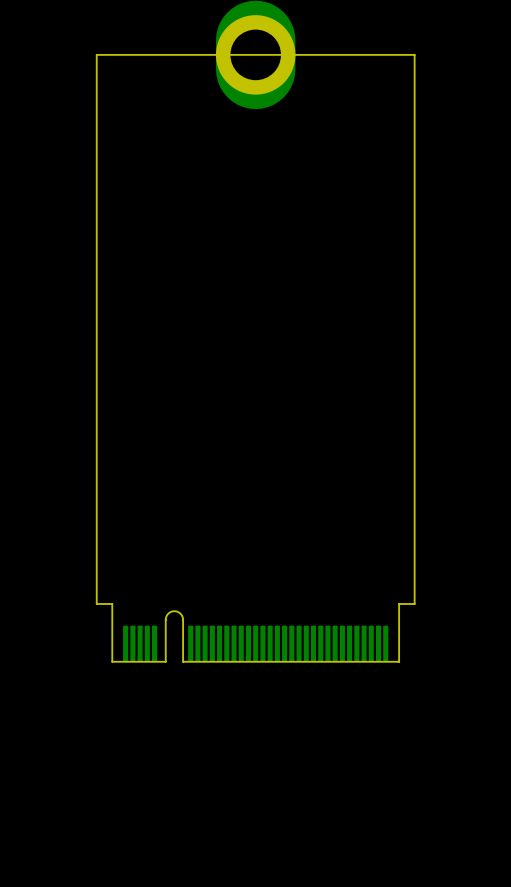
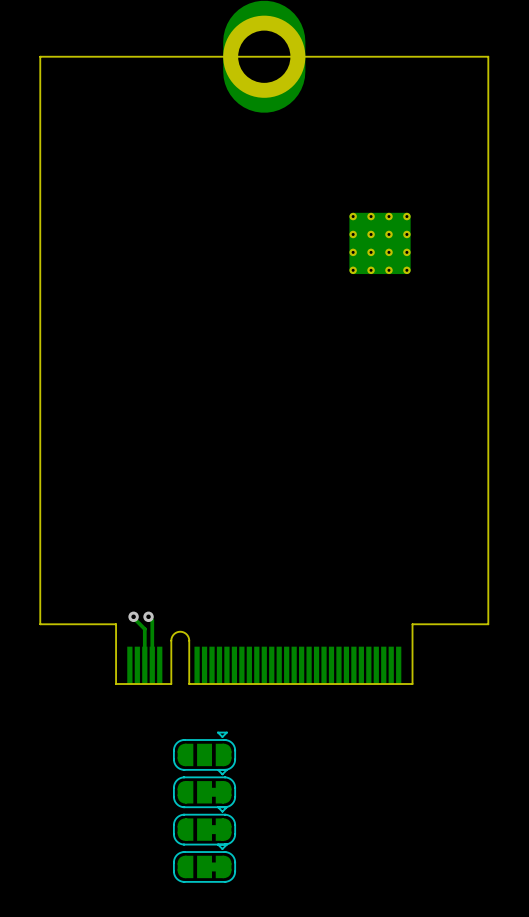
board edge: (96, 54) (96, 603) -> (100, 56) (40, 56) (40, 624) (100, 624)
board edge: (414, 54) (414, 603) -> (428, 56) (488, 56) (488, 624) (428, 624)
part: none -> (380, 243)
track: none -> (133, 616) (144, 629) (144, 665)
via: none -> (133, 616)
track: none -> (148, 616) (152, 620) (152, 665)
via: none -> (148, 616)
part: none -> (204, 751)
part: none -> (204, 788)
part: none -> (204, 825)
part: none -> (204, 863)

